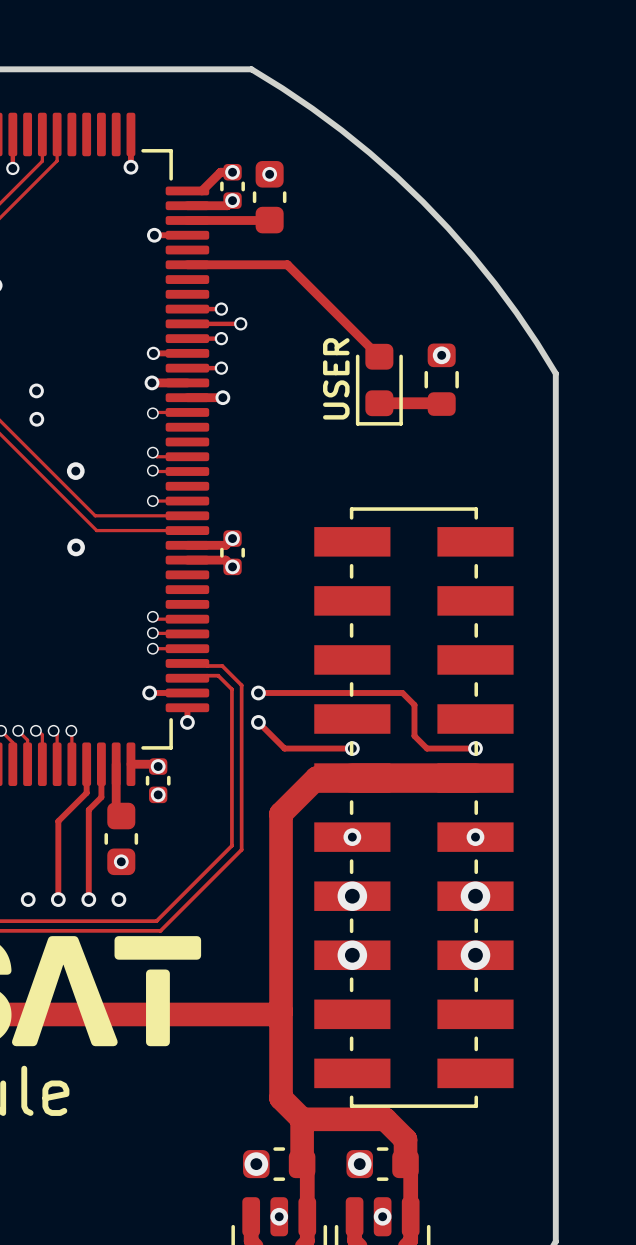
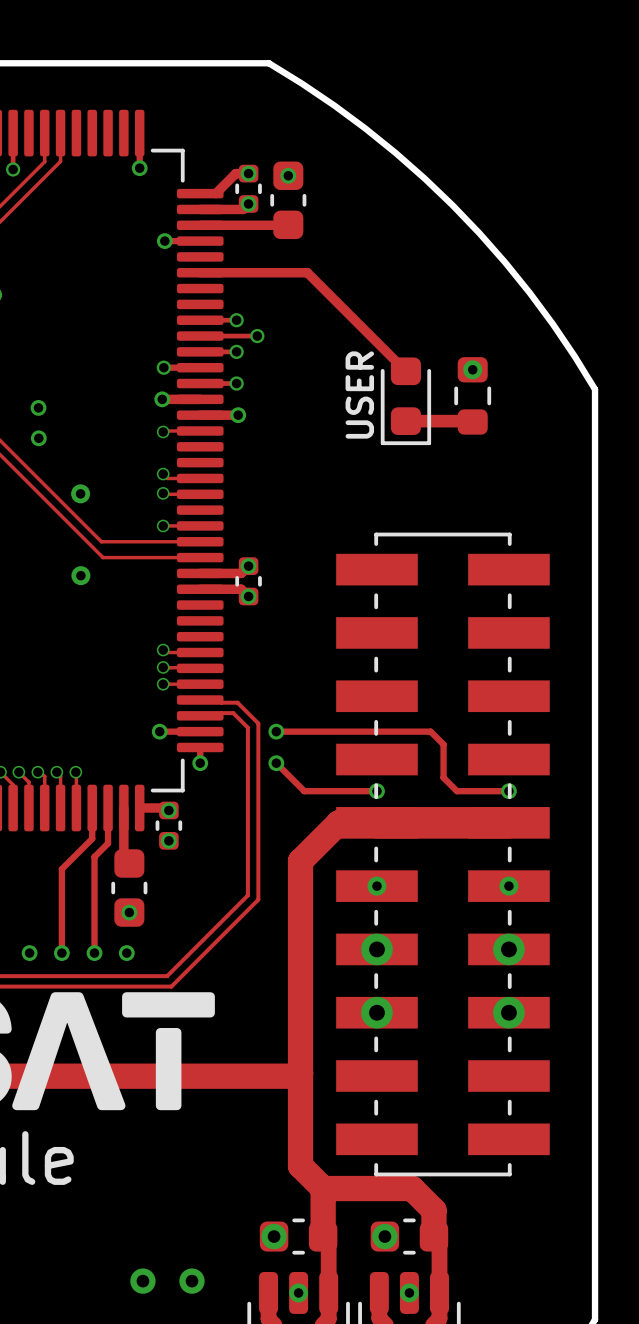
via: none -> (142, 1281)
via: none -> (191, 1281)

